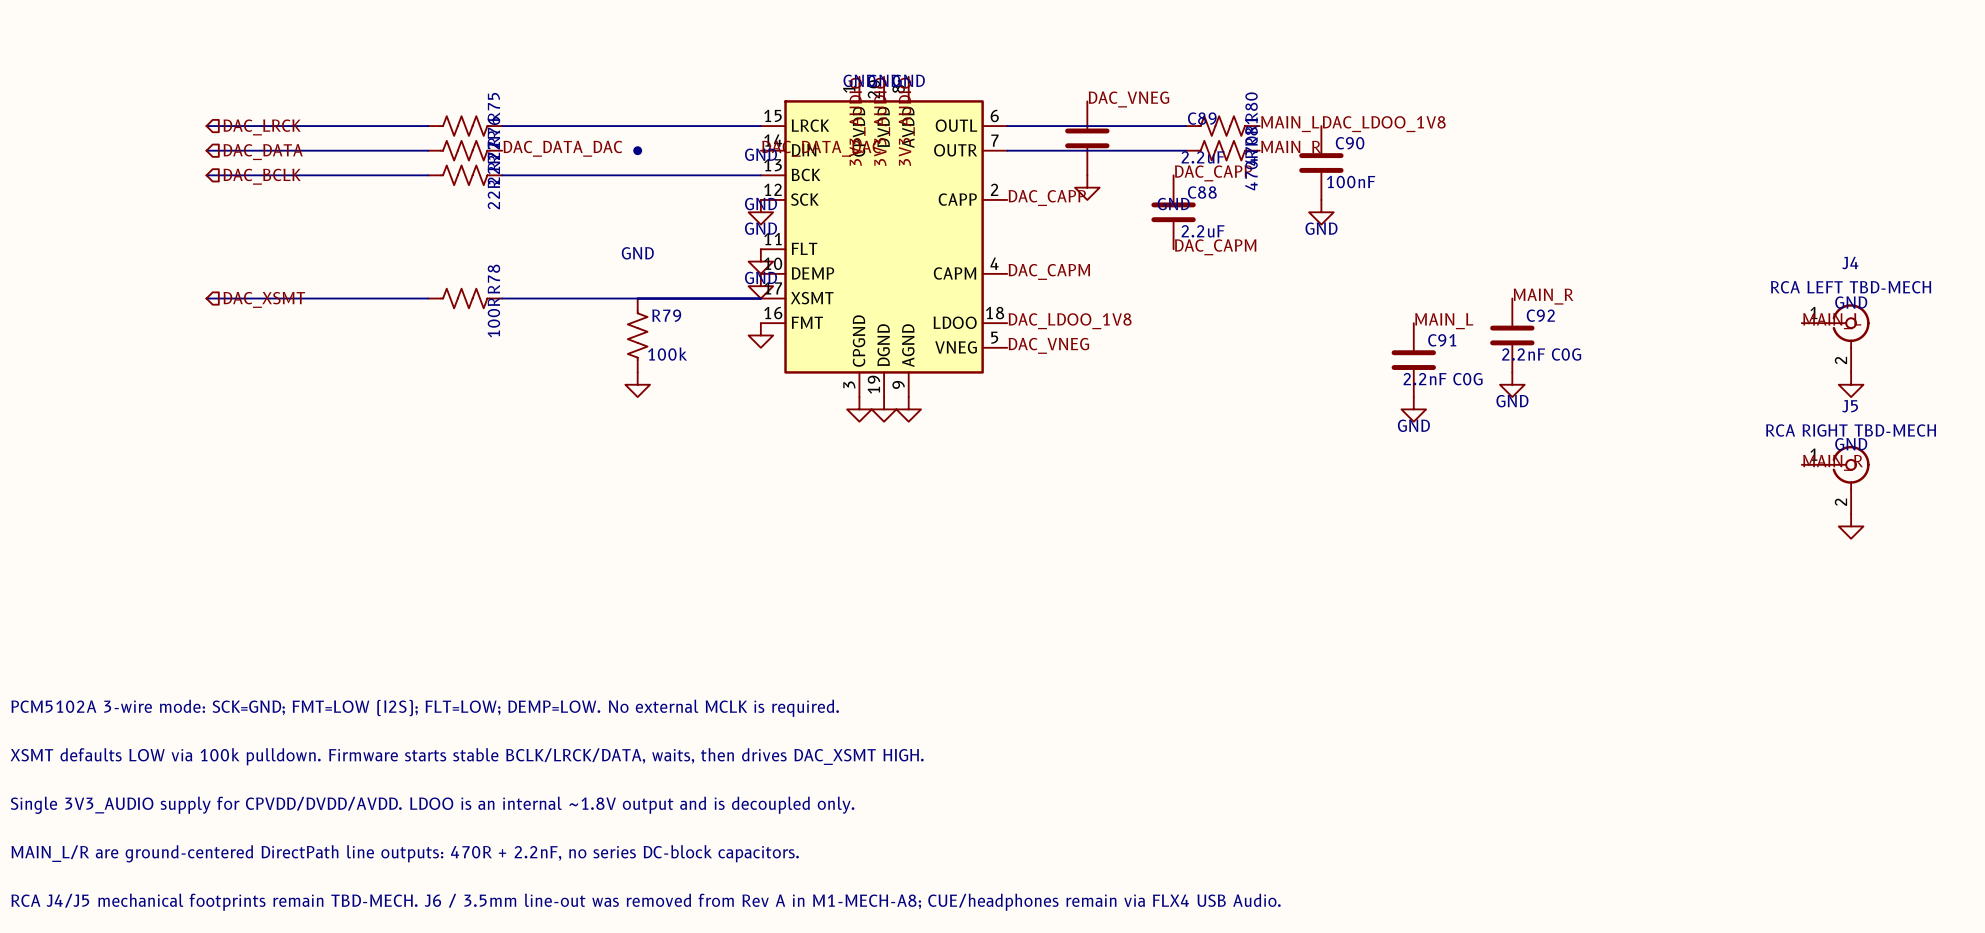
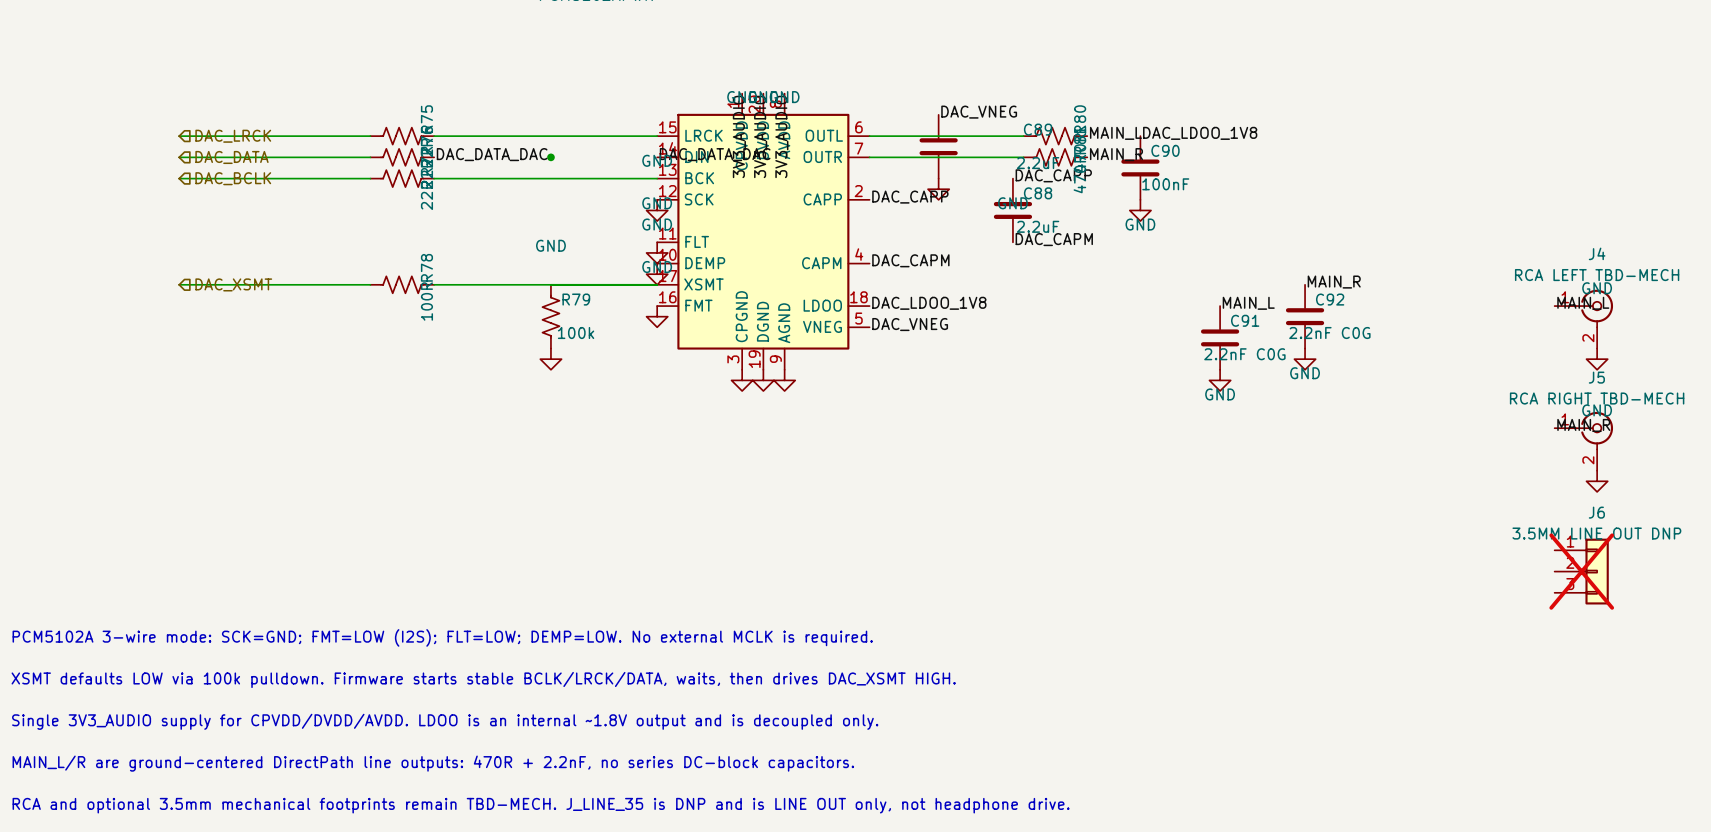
J6: none -> 3.5MM LINE OUT DNP (1581, 571)
text: RCA J4/J5 mechanical footprints remain TBD-MECH. J6 / 3.5mm line-out was removed from Rev A in M1-MECH-A8; CUE/headphones remain via FLX4 USB Audio. (646, 902) -> RCA and optional 3.5mm mechanical footprints remain TBD-MECH. J_LINE_35 is DNP and is LINE OUT only, not headphone drive. (541, 805)

